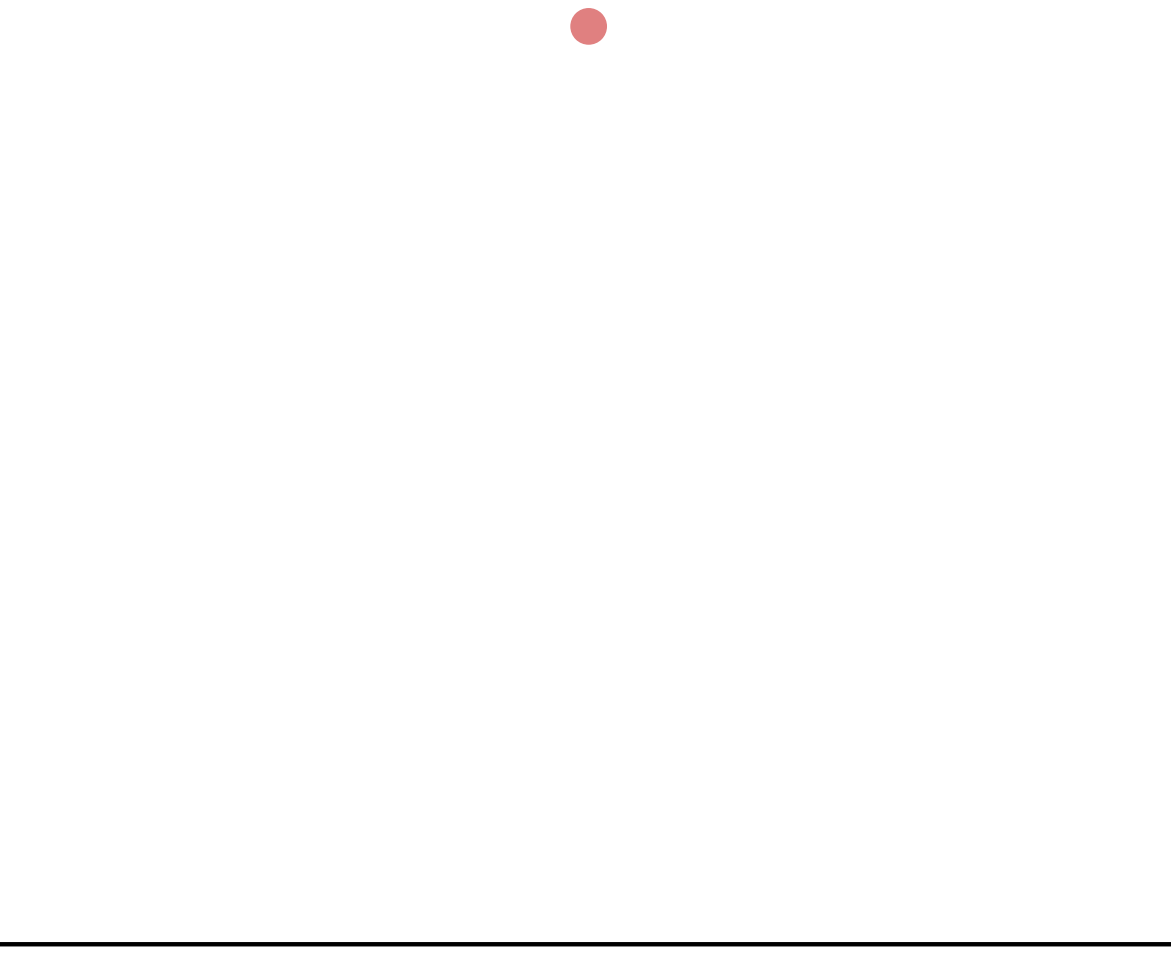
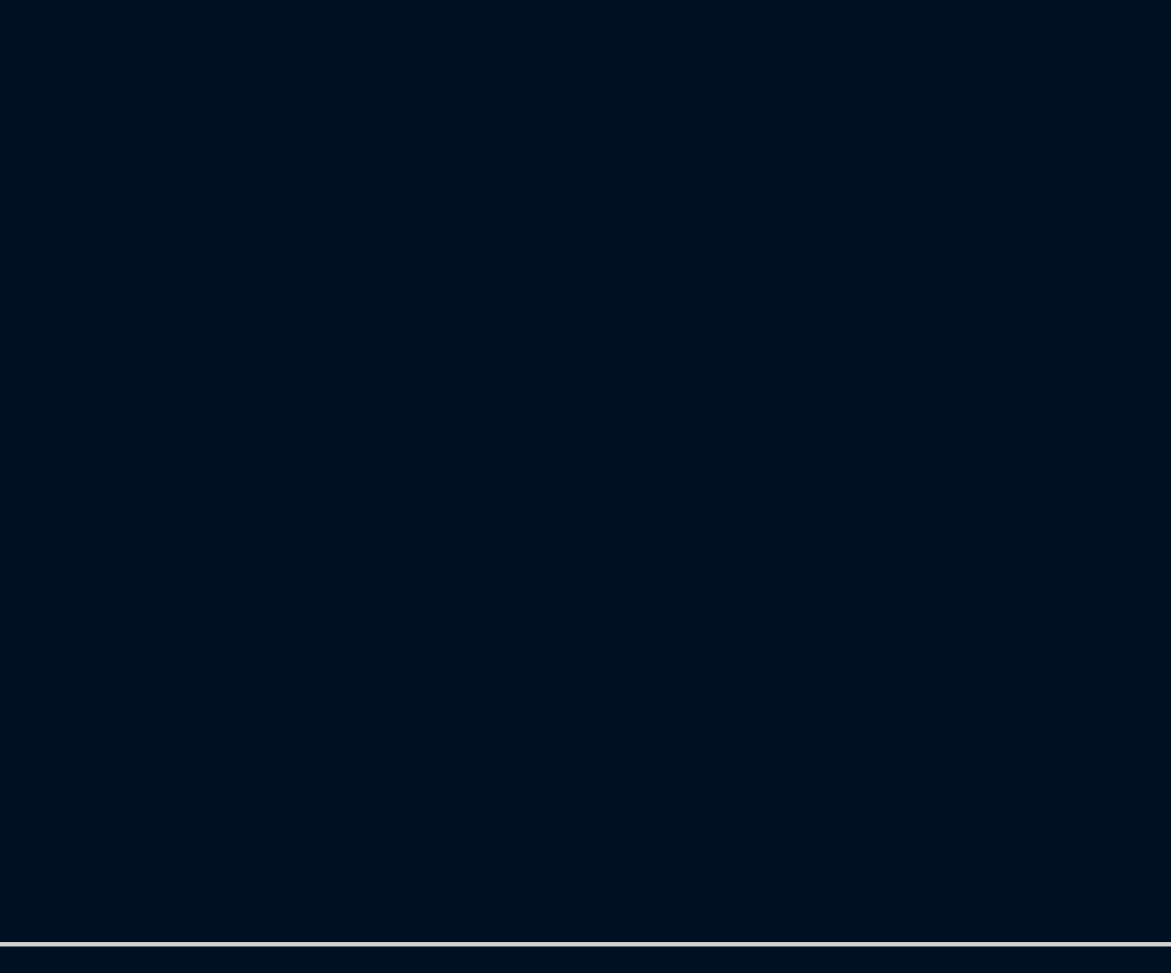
part: (588, 26) -> none

